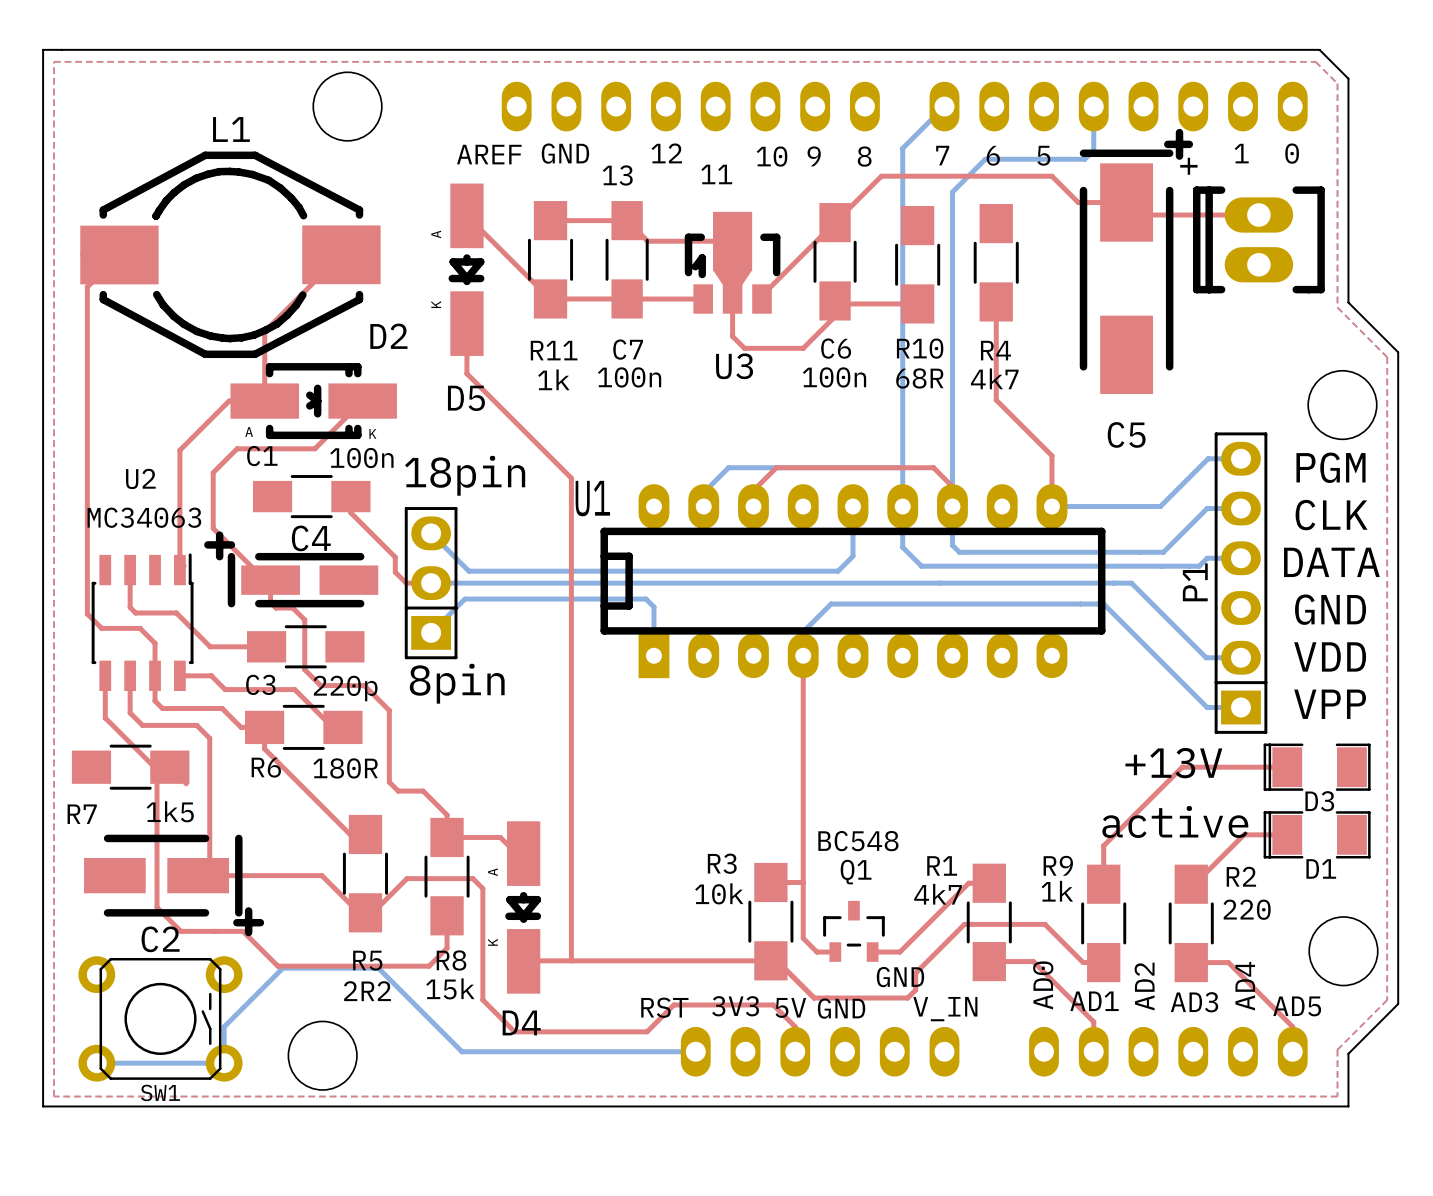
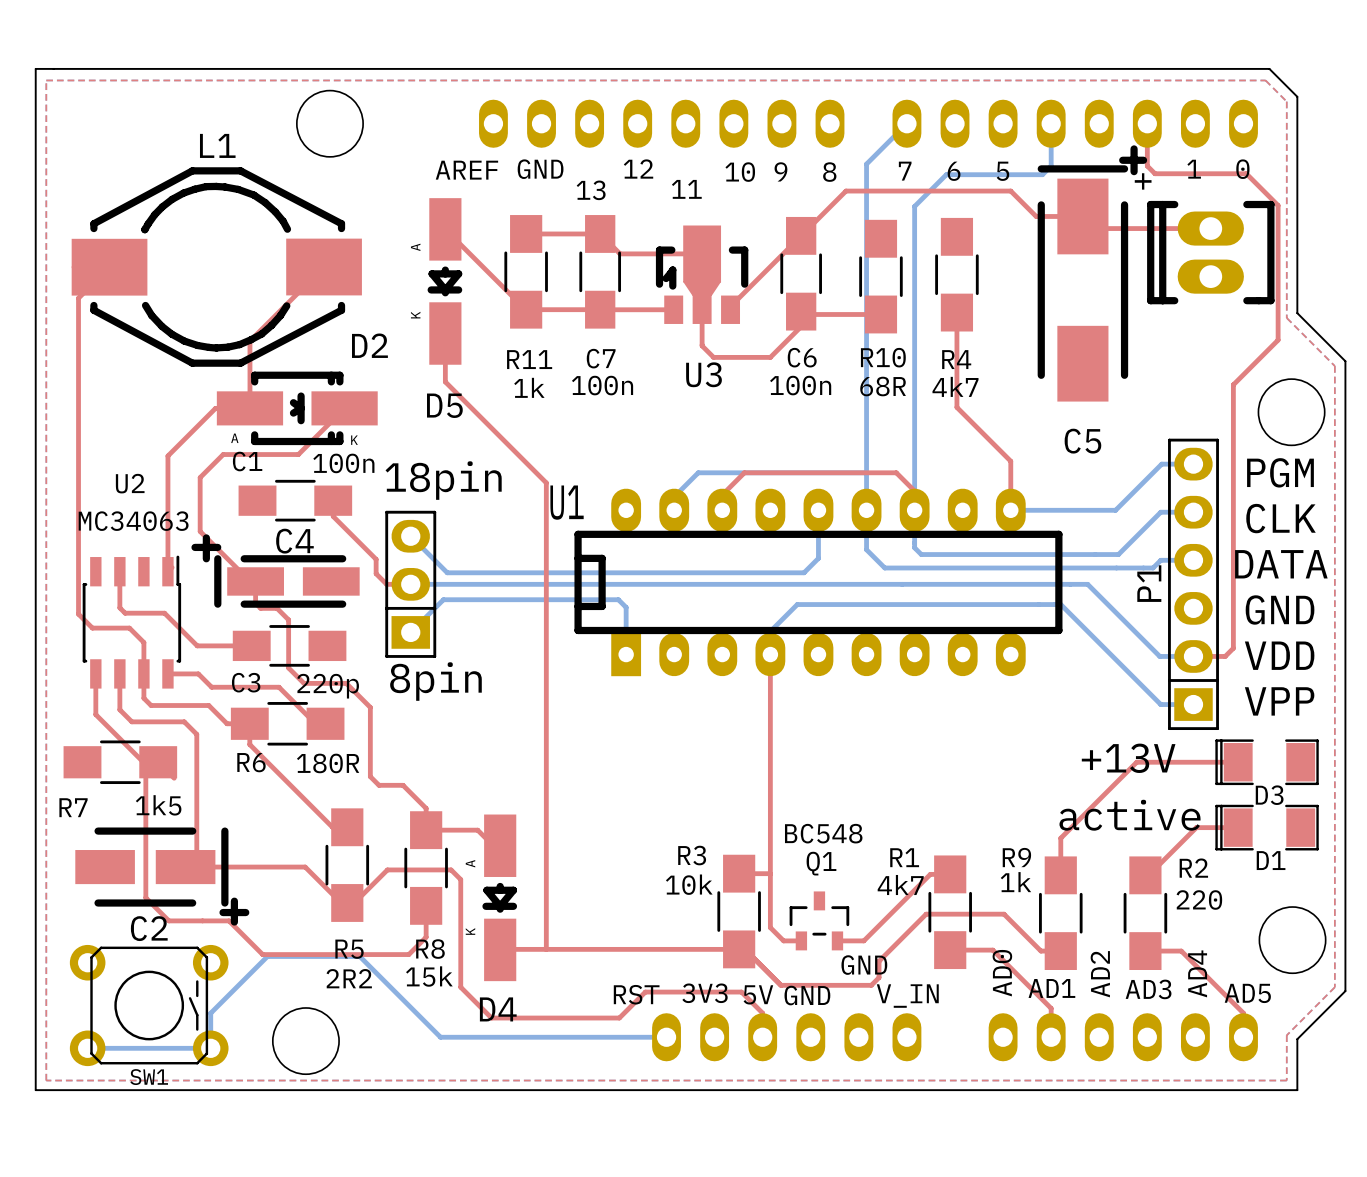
top track: none -> (1147, 123) (1147, 166) (1155, 173) (1246, 173) (1278, 205) (1278, 340) (1233, 384) (1233, 648) (1225, 656) (1193, 656)

